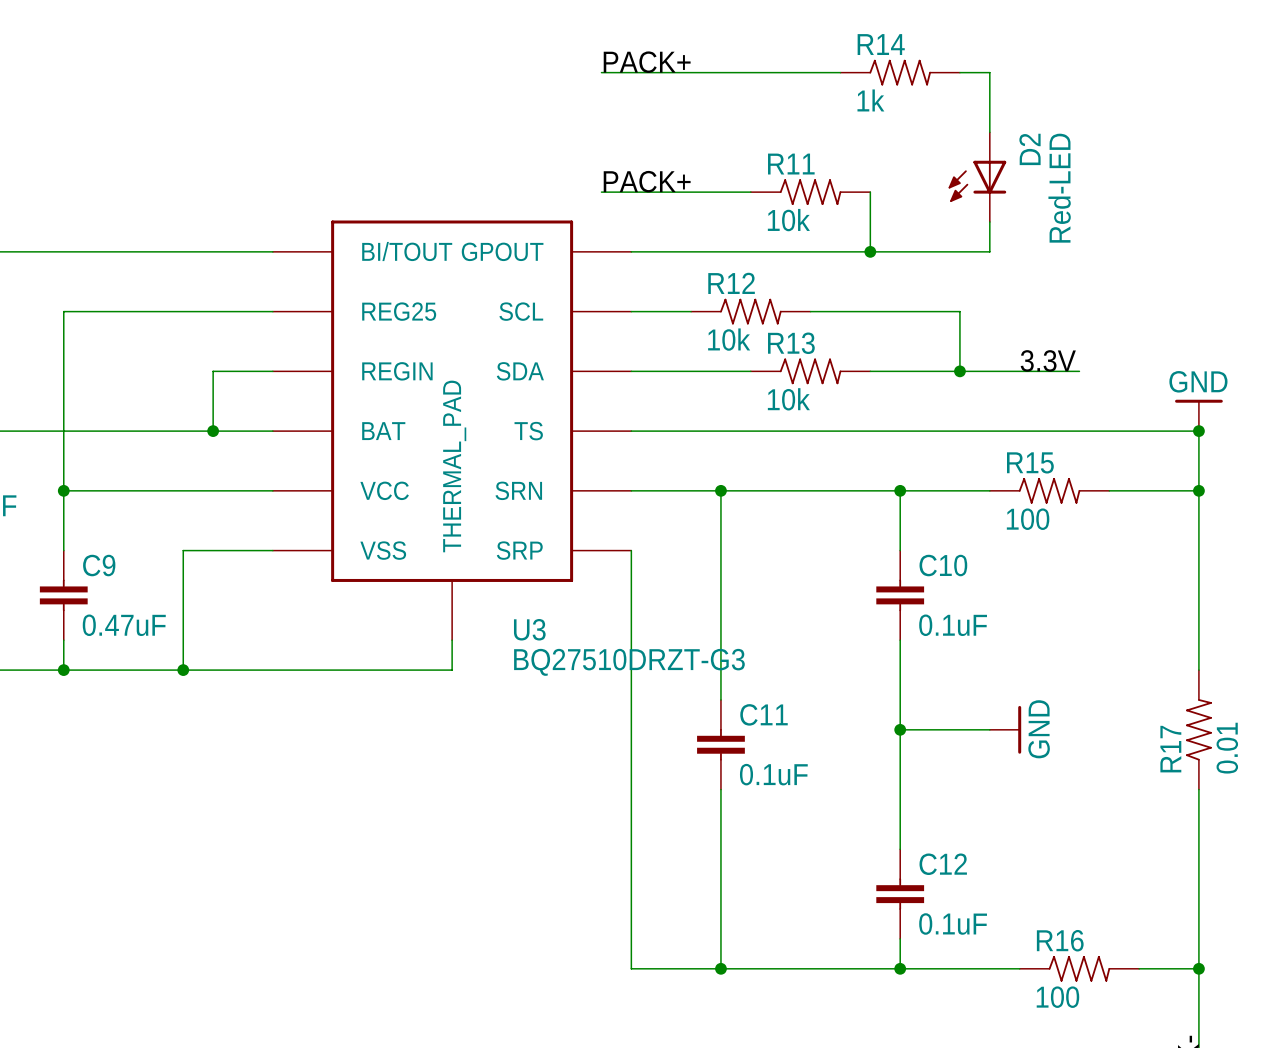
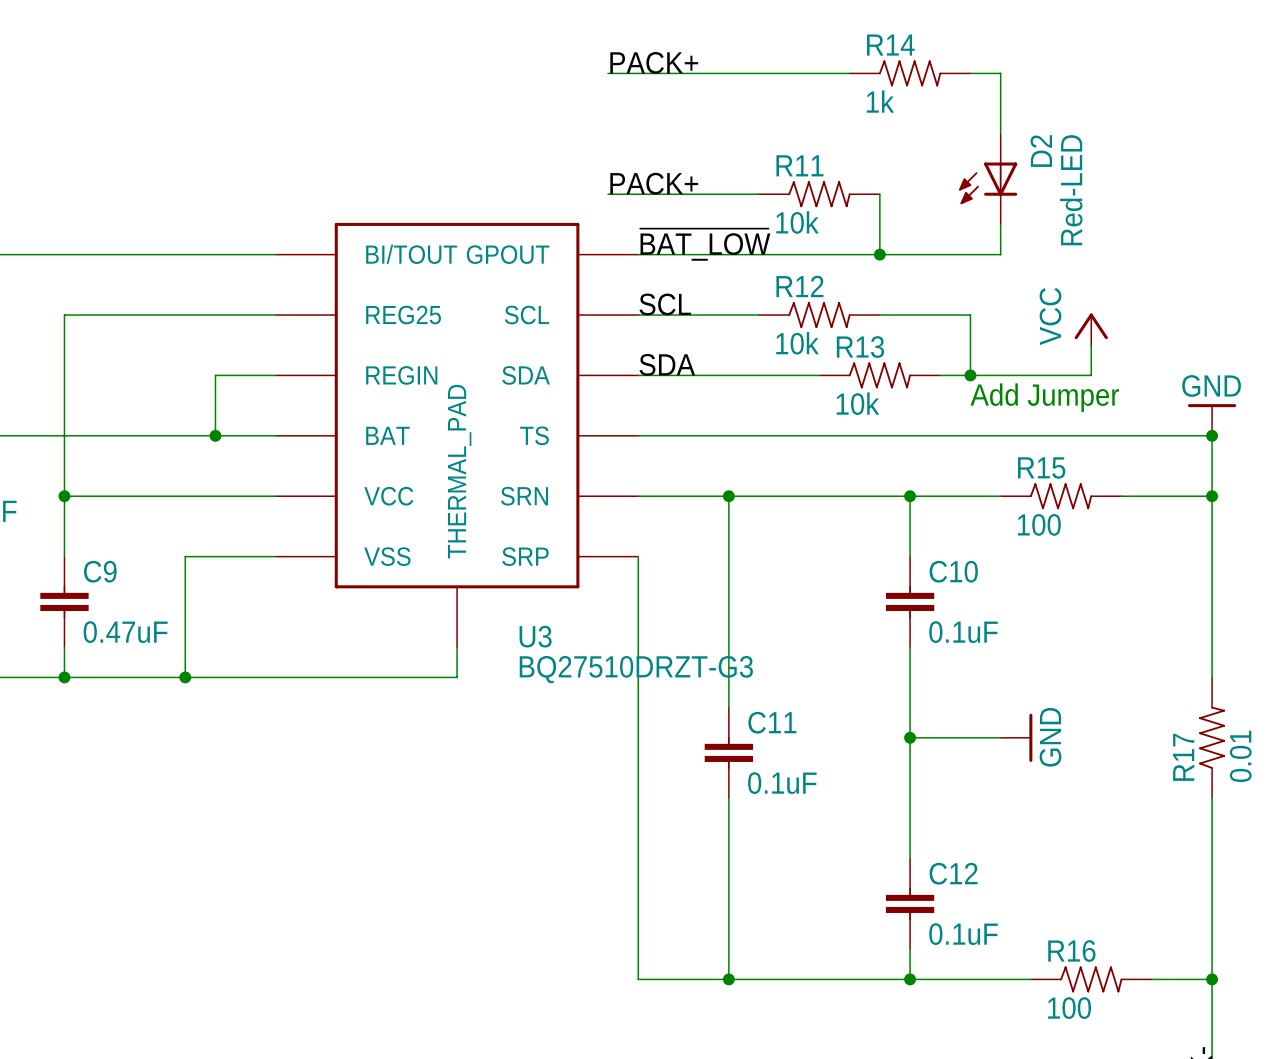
label: none -> ~{BAT_LOW} (705, 244)
label: none -> SCL (665, 304)
R12 position: (750, 311) -> (819, 315)
power symbol: none -> VCC (1091, 329)
wire: none -> (1091, 345) (1091, 375)
label: none -> SDA (667, 364)
label: 3.3V (1048, 360) -> none
R13 position: (810, 371) -> (879, 375)
text: none -> Add Jumper (1044, 397)

